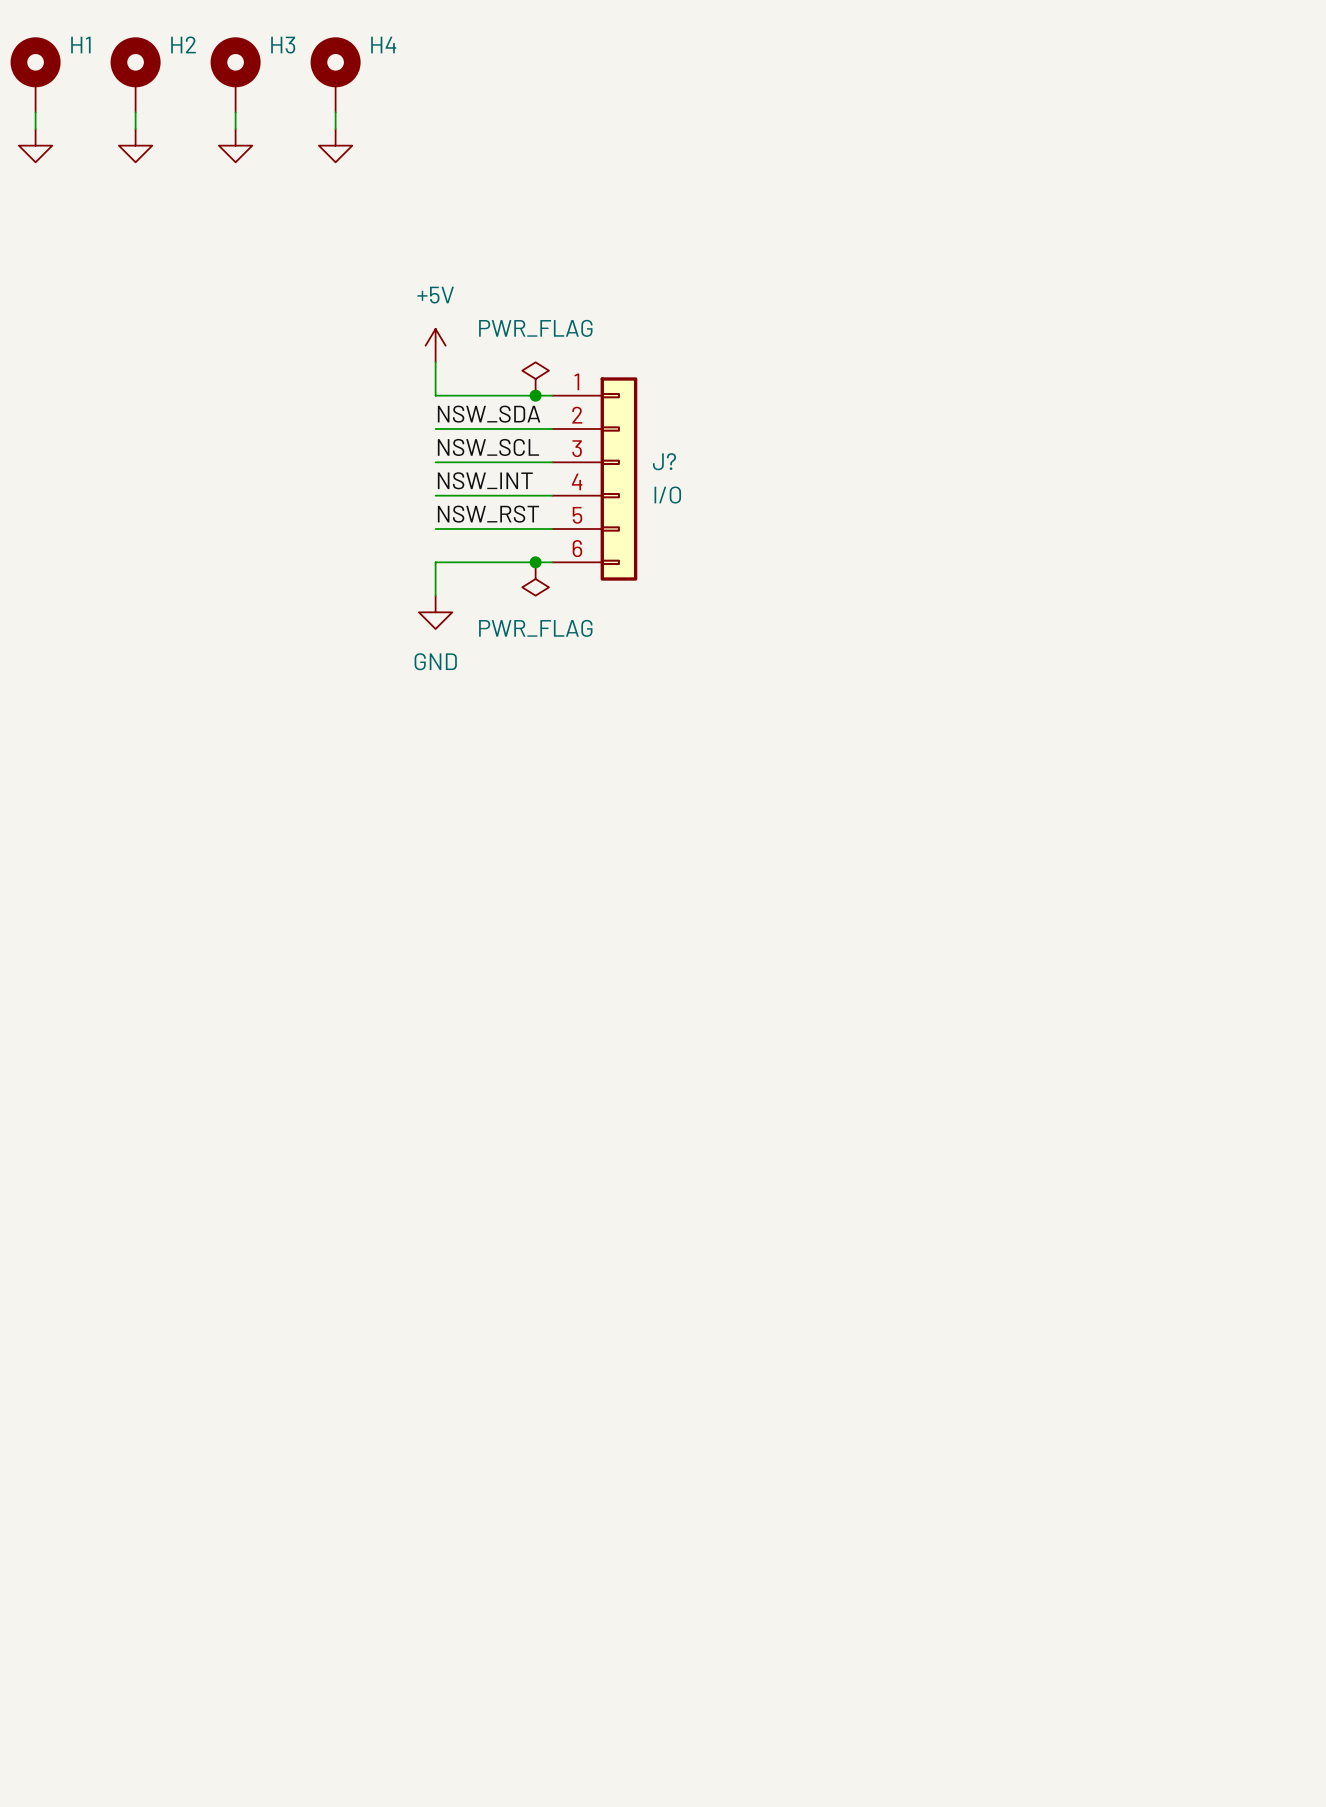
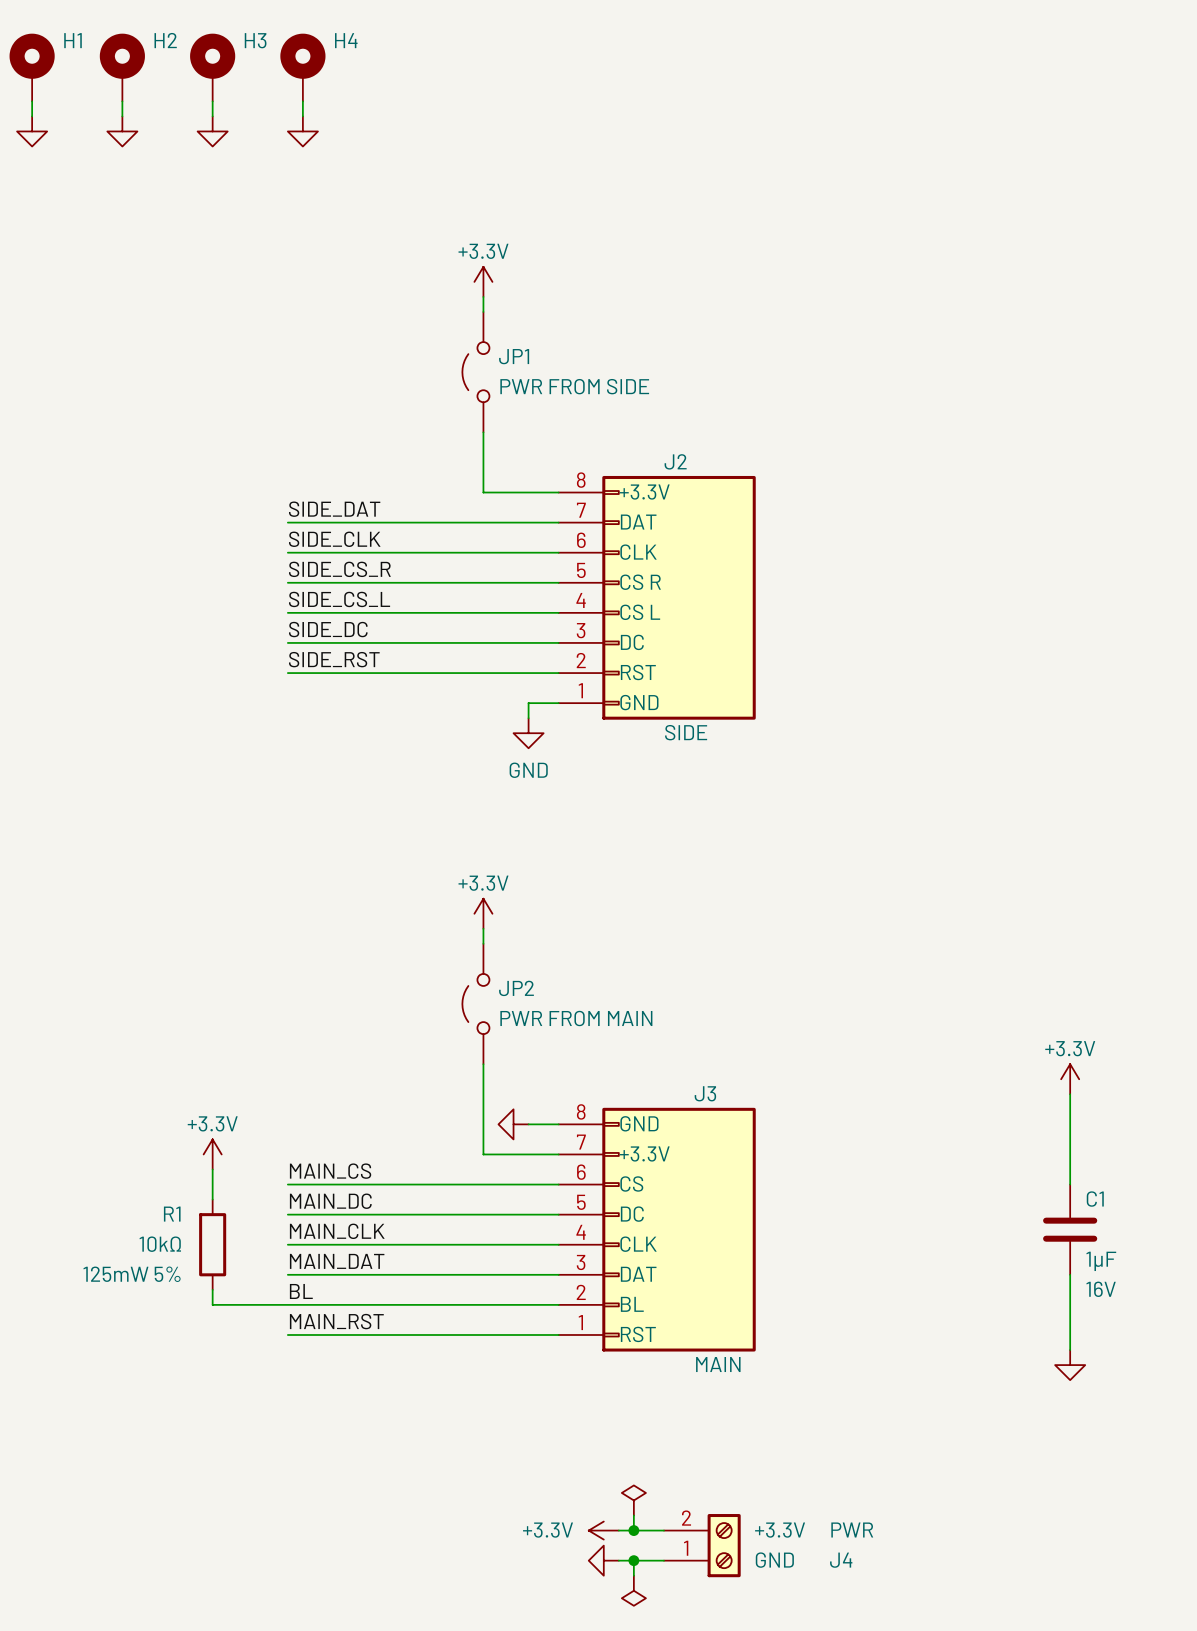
power symbol: none -> +3.3V (483, 281)
wire: none -> (483, 296) (483, 311)
power symbol: +5V (435, 345) -> none
wire: (435, 362) (435, 395) (552, 395) -> none
power symbol: PWR_FLAG (535, 378) -> none
junction: (535, 395) -> none
JP1: none -> PWR FROM SIDE (475, 372)
label: NSW_SDA (489, 414) -> none
wire: (435, 428) (552, 428) -> none
label: NSW_SCL (488, 447) -> none
wire: (435, 462) (552, 462) -> none
wire: none -> (483, 432) (483, 492) (558, 492)
J?: I/O (594, 478) -> none
label: NSW_INT (485, 480) -> none
wire: (435, 495) (552, 495) -> none
label: NSW_RST (488, 514) -> none
wire: (435, 529) (552, 529) -> none
junction: (535, 562) -> none
wire: (552, 562) (435, 562) (435, 595) -> none
label: none -> SIDE_DAT (334, 509)
wire: none -> (287, 522) (558, 522)
power symbol: PWR_FLAG (535, 579) -> none
label: none -> SIDE_CLK (334, 539)
wire: none -> (287, 552) (558, 552)
power symbol position: GND (435, 612) -> GND (528, 733)
label: none -> SIDE_CS_R (339, 569)
wire: none -> (287, 582) (558, 582)
power symbol text position: GND (435, 661) -> GND (528, 770)
J2: none -> (657, 597)
label: none -> SIDE_CS_L (339, 599)
wire: none -> (287, 612) (558, 612)
label: none -> SIDE_DC (328, 629)
wire: none -> (287, 642) (558, 642)
label: none -> SIDE_RST (334, 659)
wire: none -> (287, 673) (558, 673)
wire: none -> (558, 703) (528, 703) (528, 718)
power symbol: none -> +3.3V (483, 913)
wire: none -> (483, 928) (483, 943)
JP2: none -> PWR FROM MAIN (475, 1004)
wire: none -> (483, 1064) (483, 1154) (558, 1154)
power symbol: none -> +3.3V (1070, 1079)
wire: none -> (1070, 1094) (1070, 1184)
power symbol: none -> (513, 1124)
wire: none -> (528, 1124) (558, 1124)
power symbol: none -> +3.3V (212, 1154)
wire: none -> (212, 1169) (212, 1199)
label: none -> MAIN_CS (330, 1171)
wire: none -> (287, 1184) (558, 1184)
label: none -> MAIN_DC (330, 1201)
wire: none -> (287, 1214) (558, 1214)
J3: none -> (657, 1229)
C1: none -> 1μF (1070, 1229)
label: none -> MAIN_CLK (337, 1231)
R1: none -> 10kΩ (212, 1244)
wire: none -> (287, 1244) (558, 1244)
label: none -> MAIN_DAT (337, 1261)
wire: none -> (287, 1274) (558, 1274)
wire: none -> (1070, 1274) (1070, 1350)
wire: none -> (212, 1289) (212, 1304) (558, 1304)
label: none -> BL (301, 1291)
label: none -> MAIN_RST (336, 1321)
wire: none -> (287, 1334) (558, 1334)
power symbol: none -> (1070, 1365)
power symbol: none -> (633, 1500)
wire: none -> (633, 1515) (633, 1530)
power symbol: none -> +3.3V (603, 1530)
wire: none -> (618, 1530) (663, 1530)
junction: none -> (633, 1530)
J4: none -> (702, 1545)
power symbol: none -> (603, 1560)
wire: none -> (618, 1560) (663, 1560)
wire: none -> (633, 1560) (633, 1575)
junction: none -> (633, 1560)
power symbol: none -> (633, 1590)

